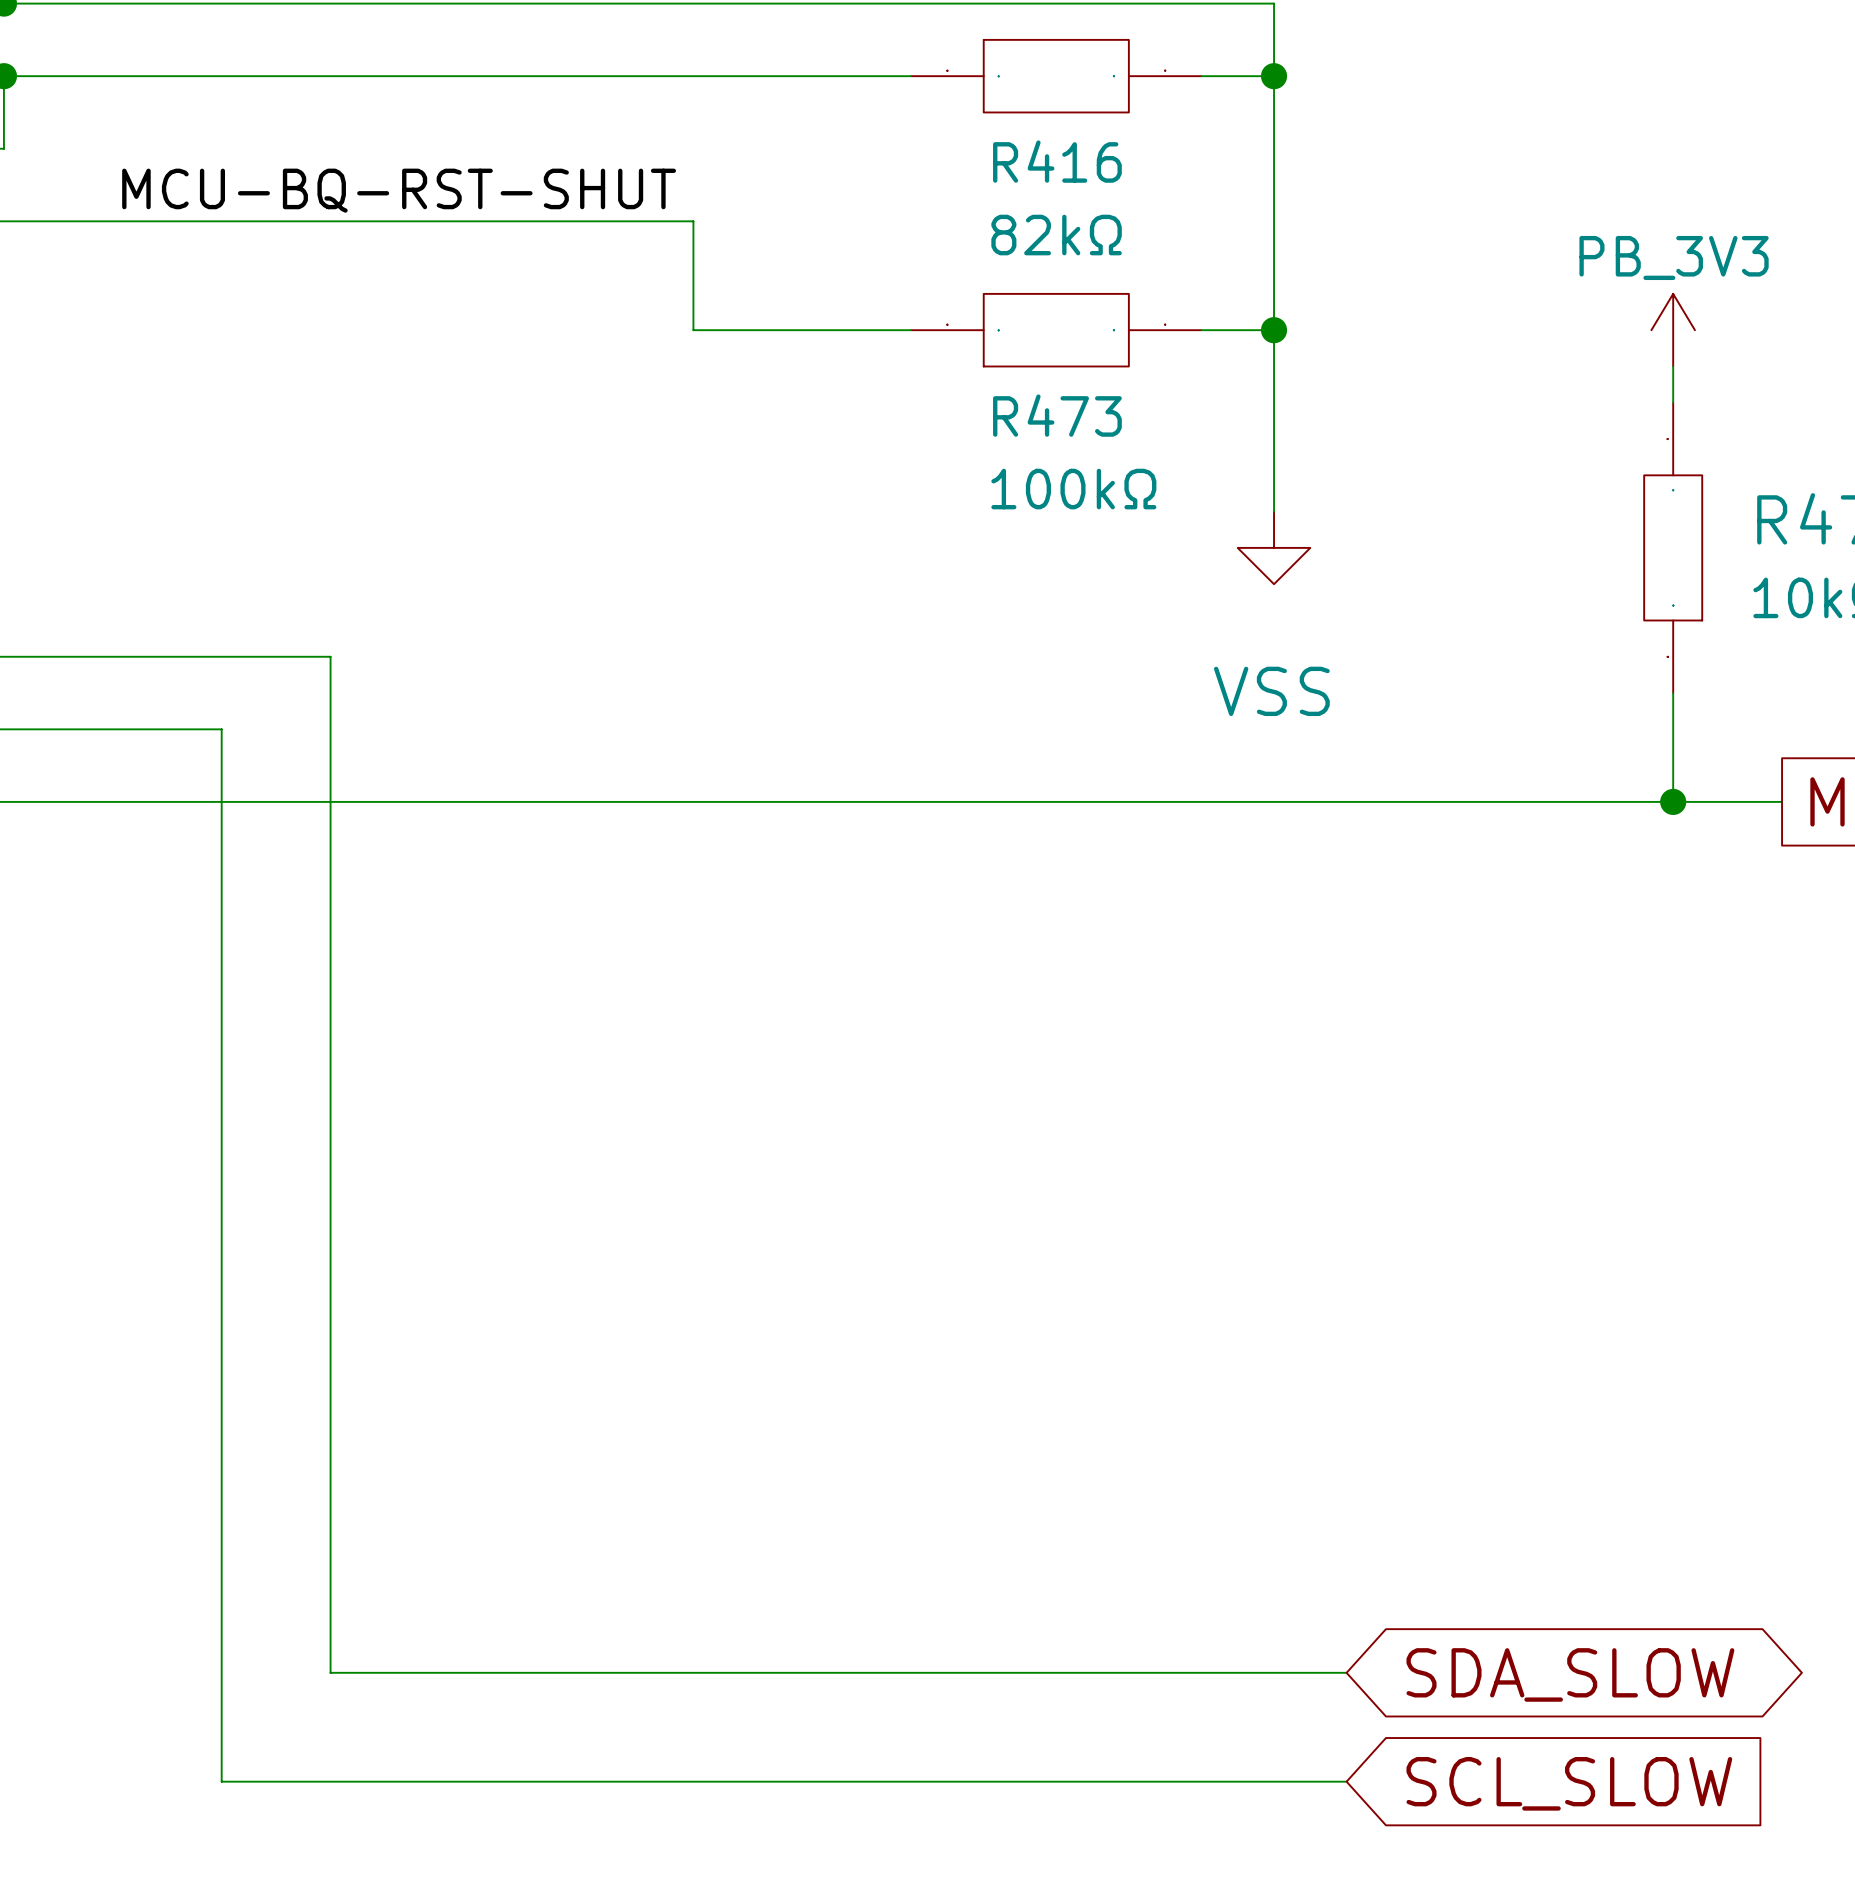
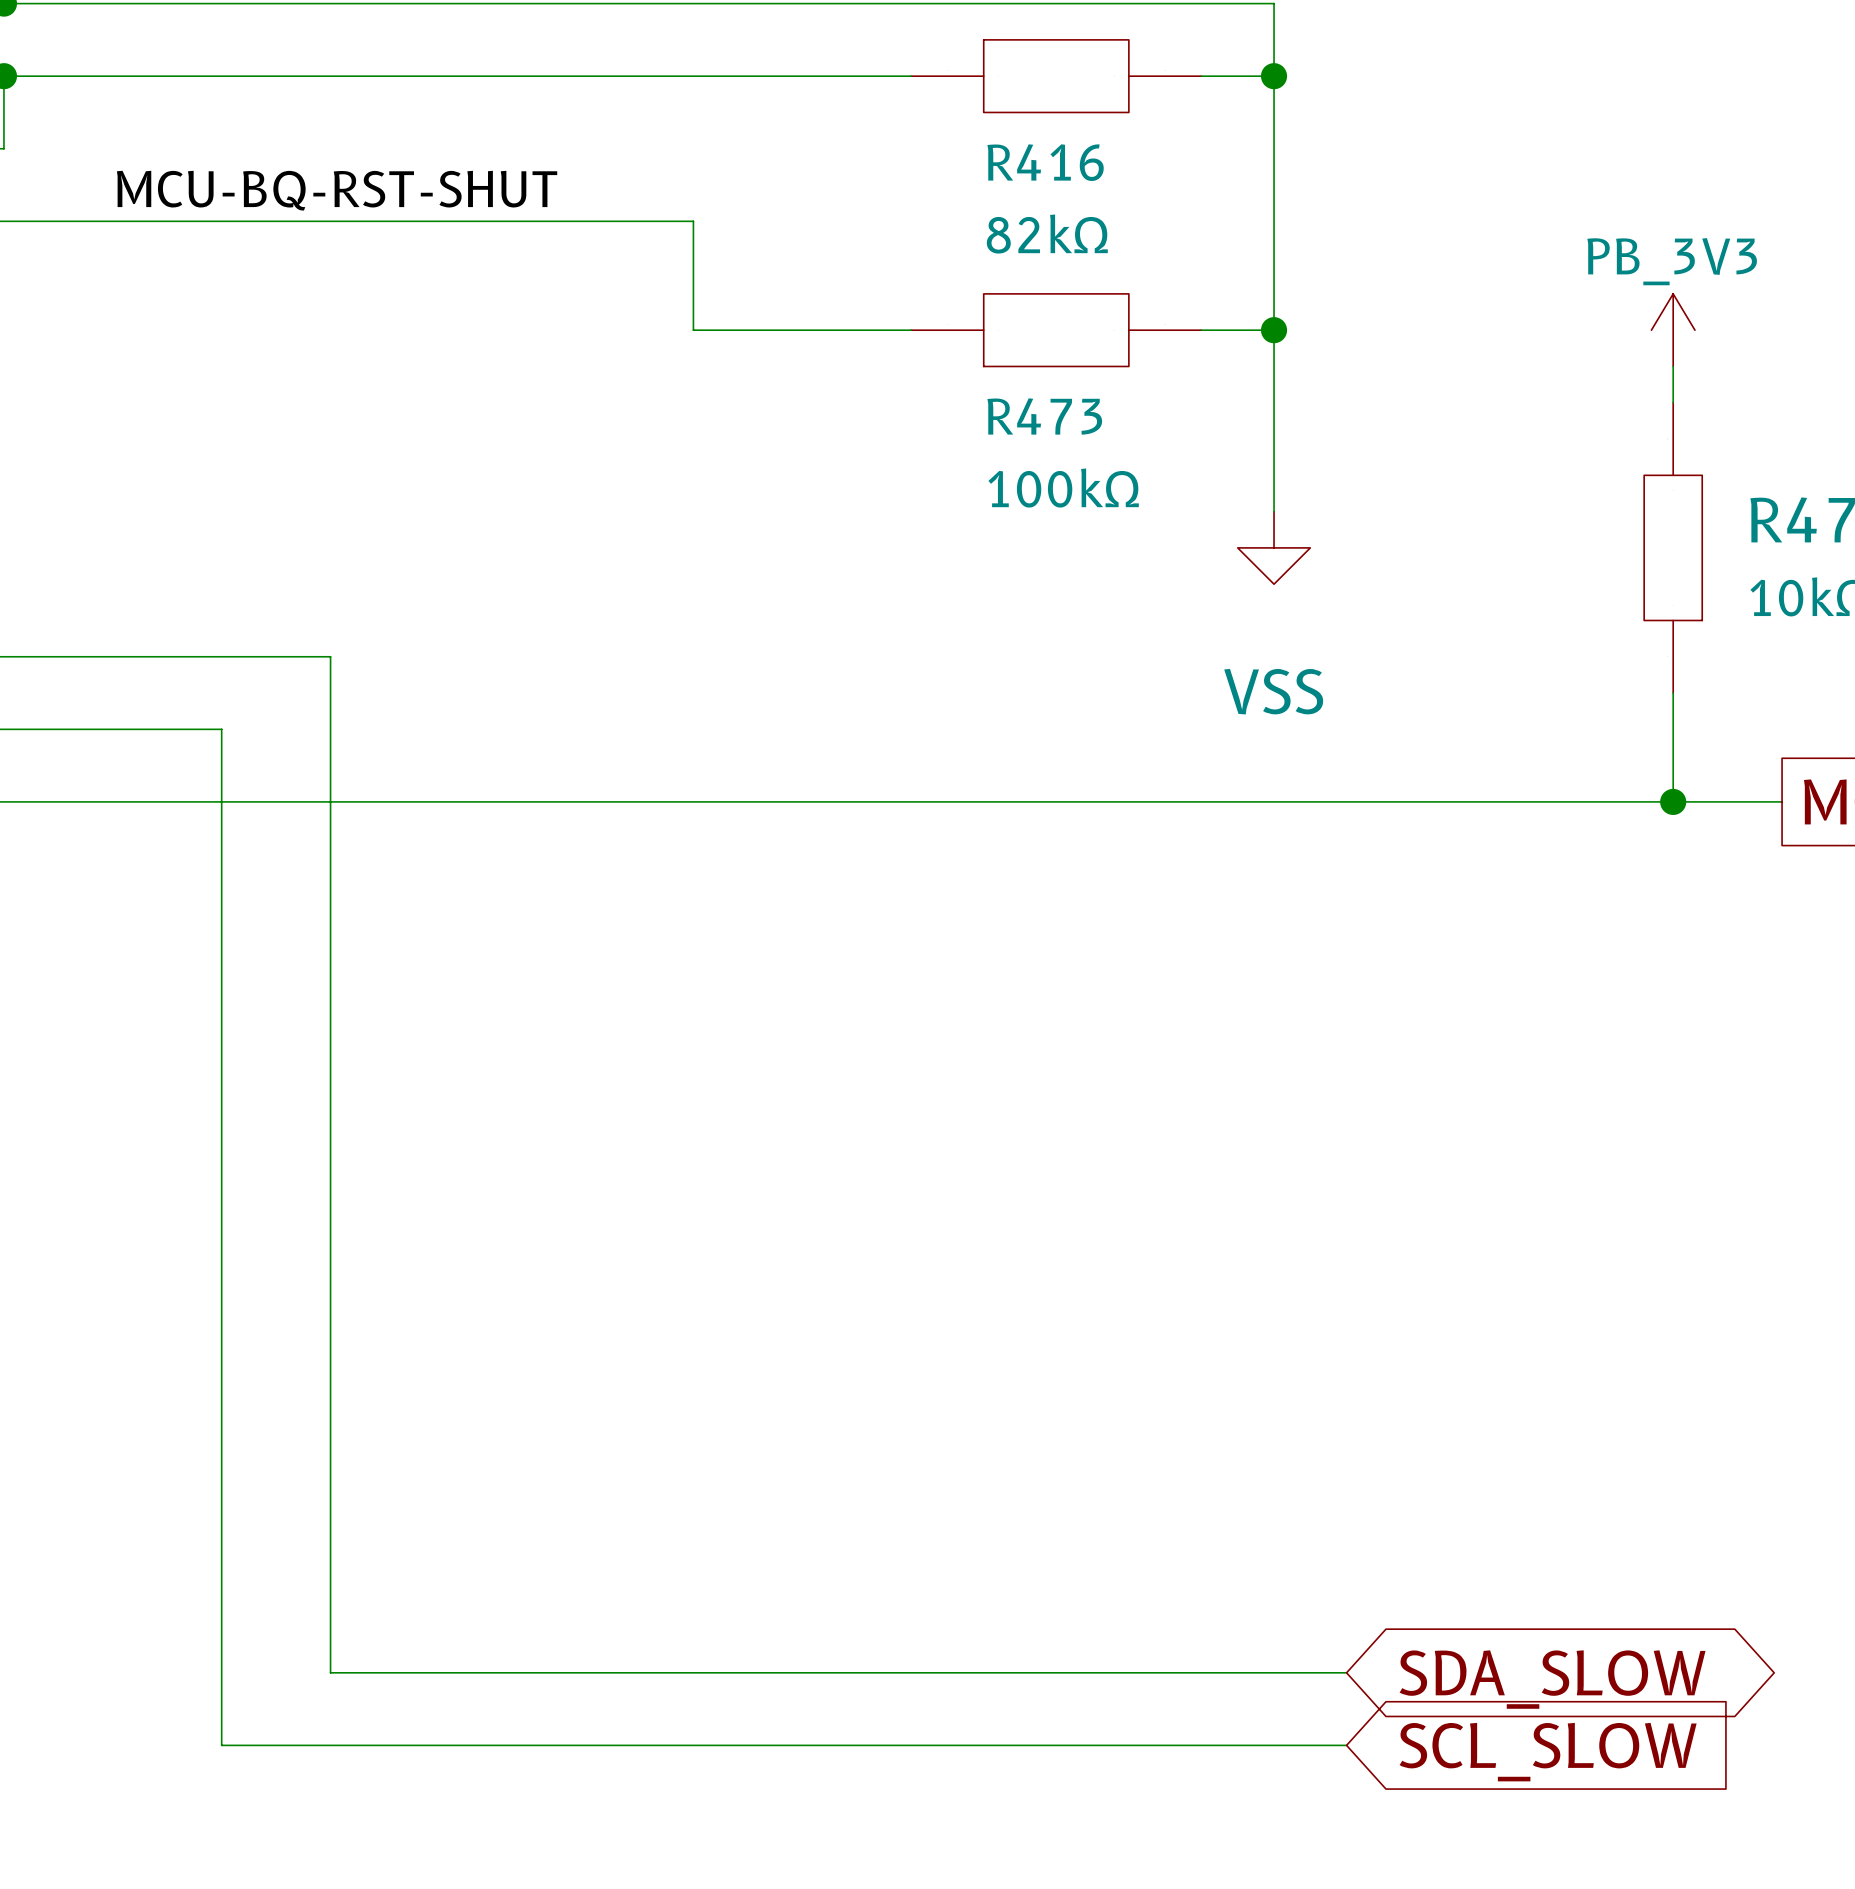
wire: (221, 1745) (221, 1781) (1346, 1781) -> (221, 1745) (1346, 1745)
global label position: SCL_SLOW (1569, 1783) -> SCL_SLOW (1548, 1752)

